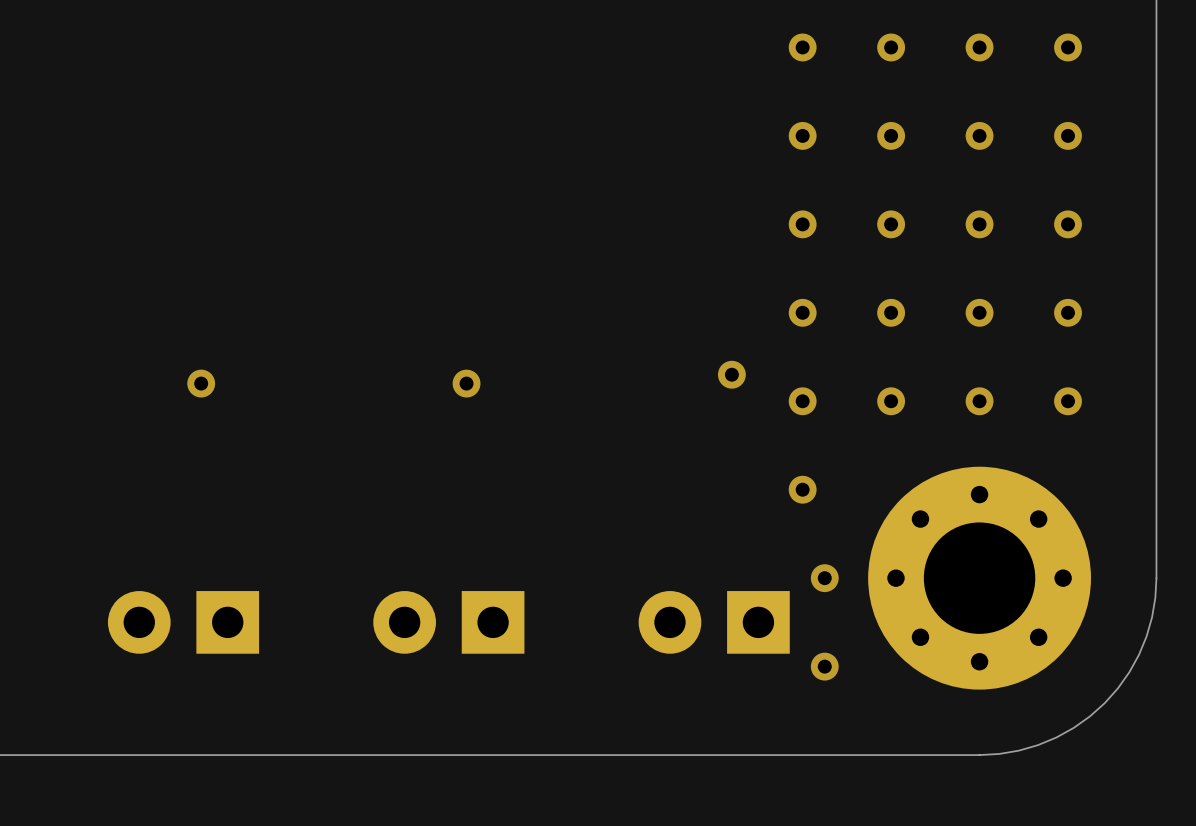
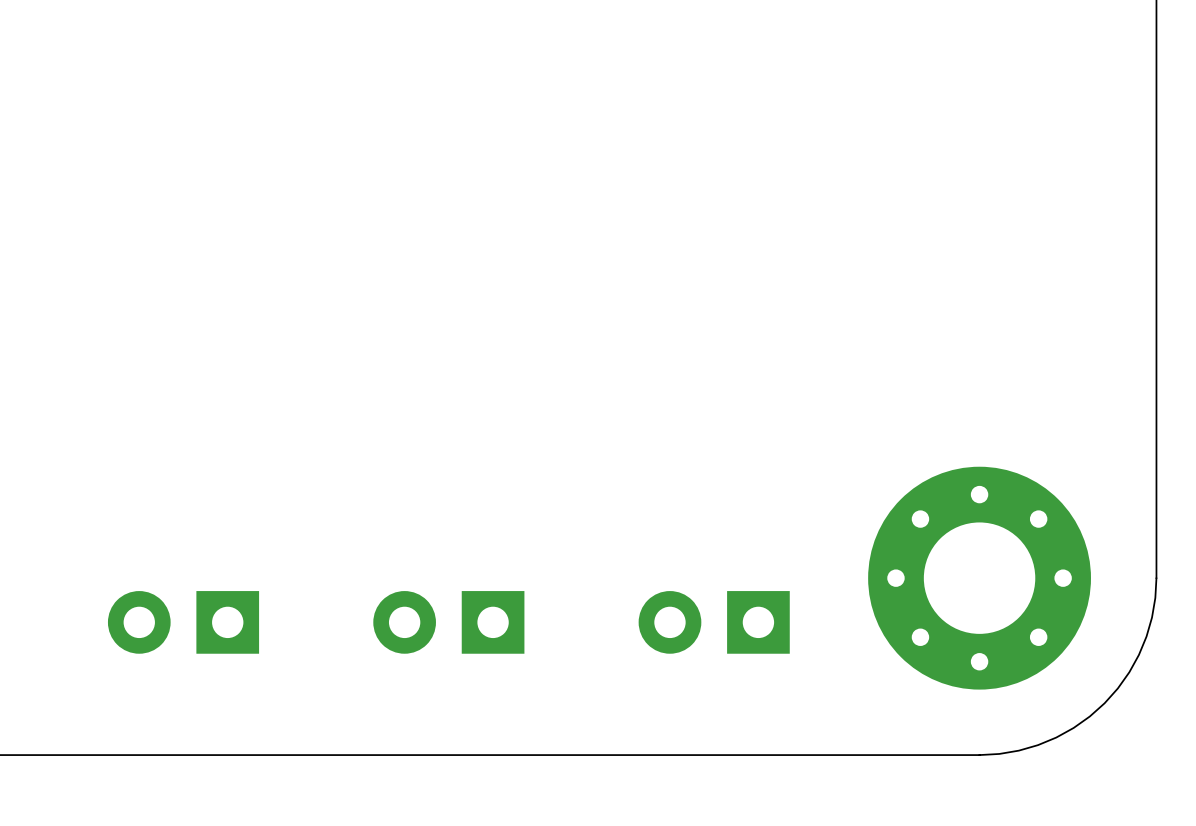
via: (802, 47) -> none
via: (891, 47) -> none
via: (979, 47) -> none
via: (1068, 47) -> none
via: (802, 135) -> none
via: (891, 135) -> none
via: (979, 135) -> none
via: (1068, 135) -> none
via: (802, 224) -> none
via: (891, 224) -> none
via: (979, 224) -> none
via: (1068, 224) -> none
via: (802, 312) -> none
via: (891, 312) -> none
via: (979, 312) -> none
via: (1068, 312) -> none
via: (731, 374) -> none
via: (201, 383) -> none
via: (466, 383) -> none
via: (802, 401) -> none
via: (891, 401) -> none
via: (979, 401) -> none
via: (1068, 401) -> none
via: (802, 489) -> none
via: (824, 578) -> none
via: (824, 666) -> none

